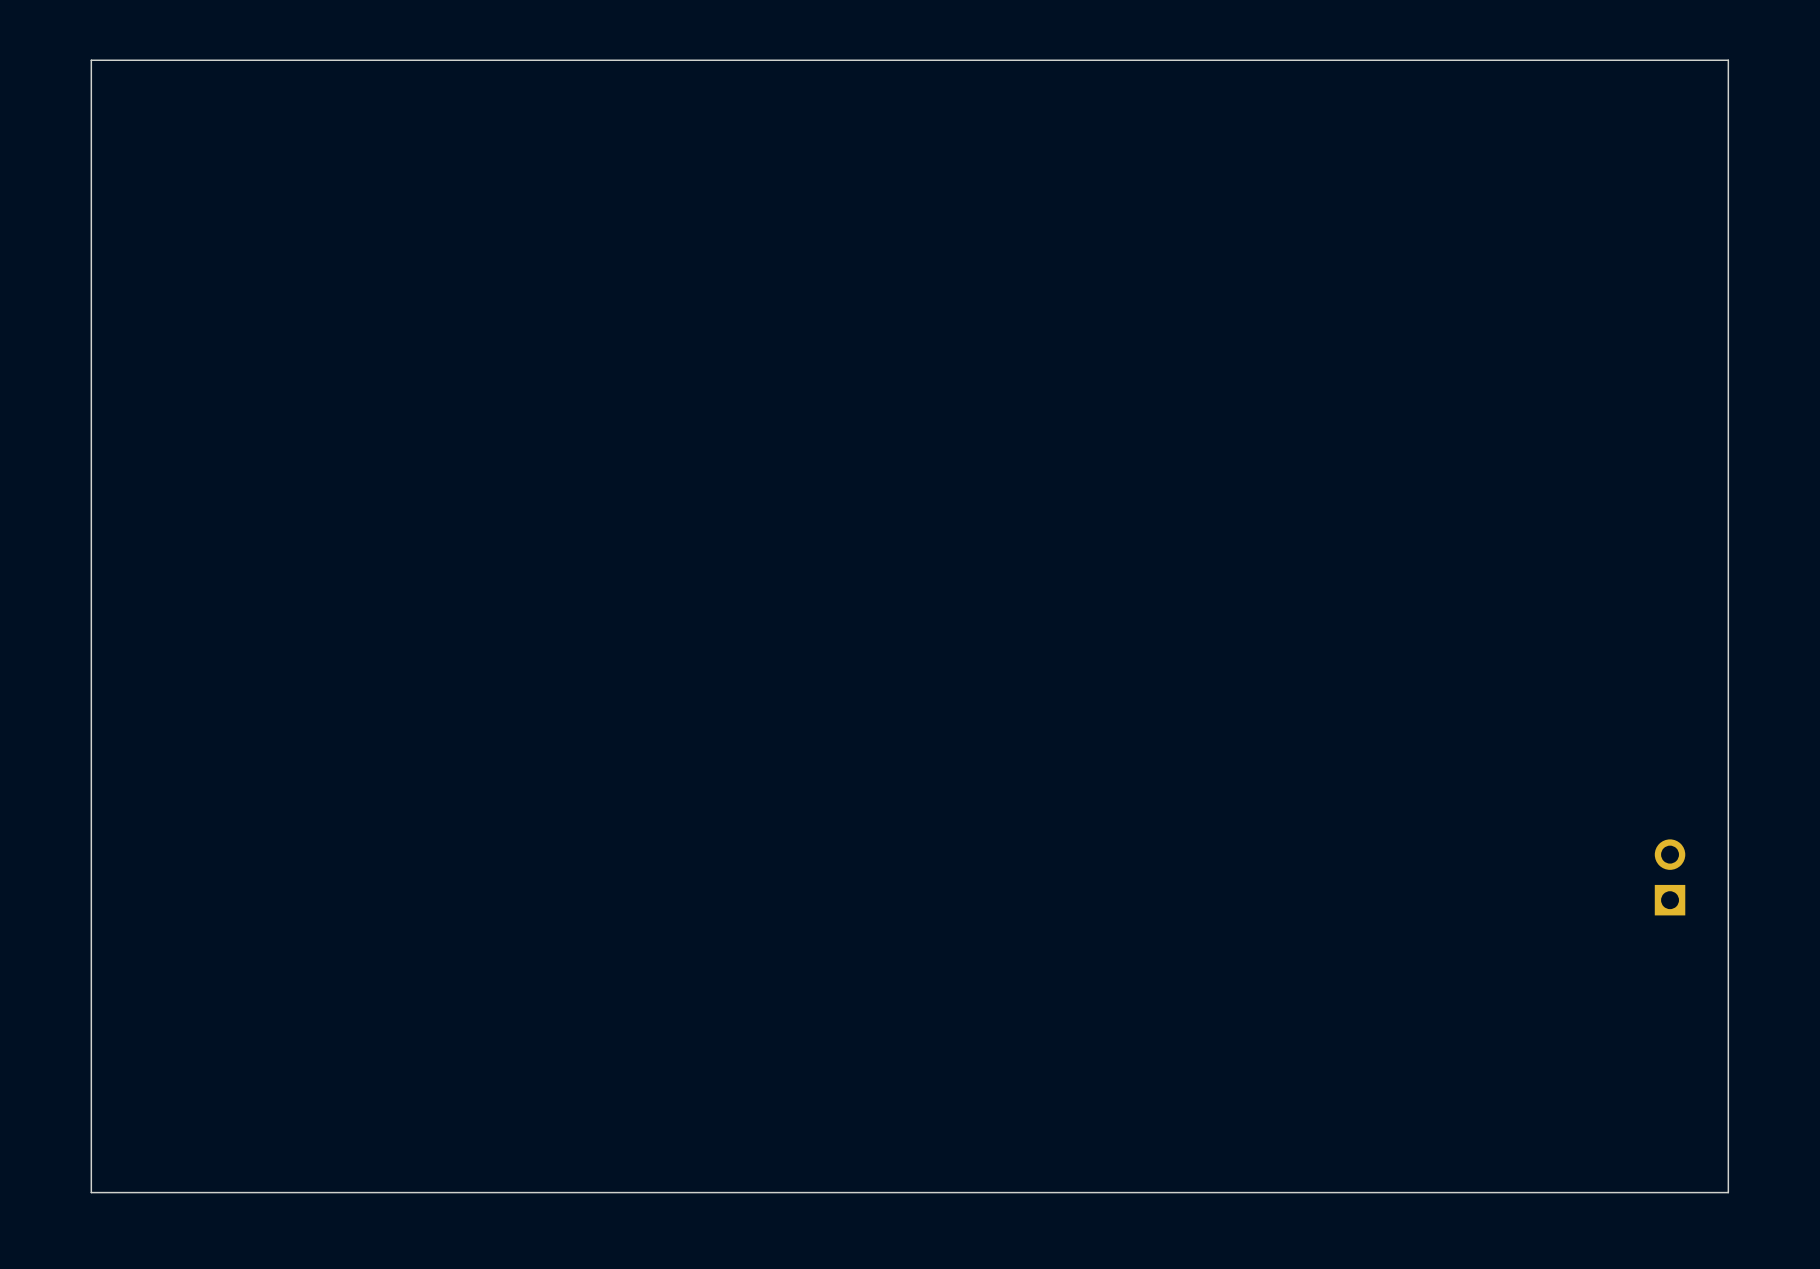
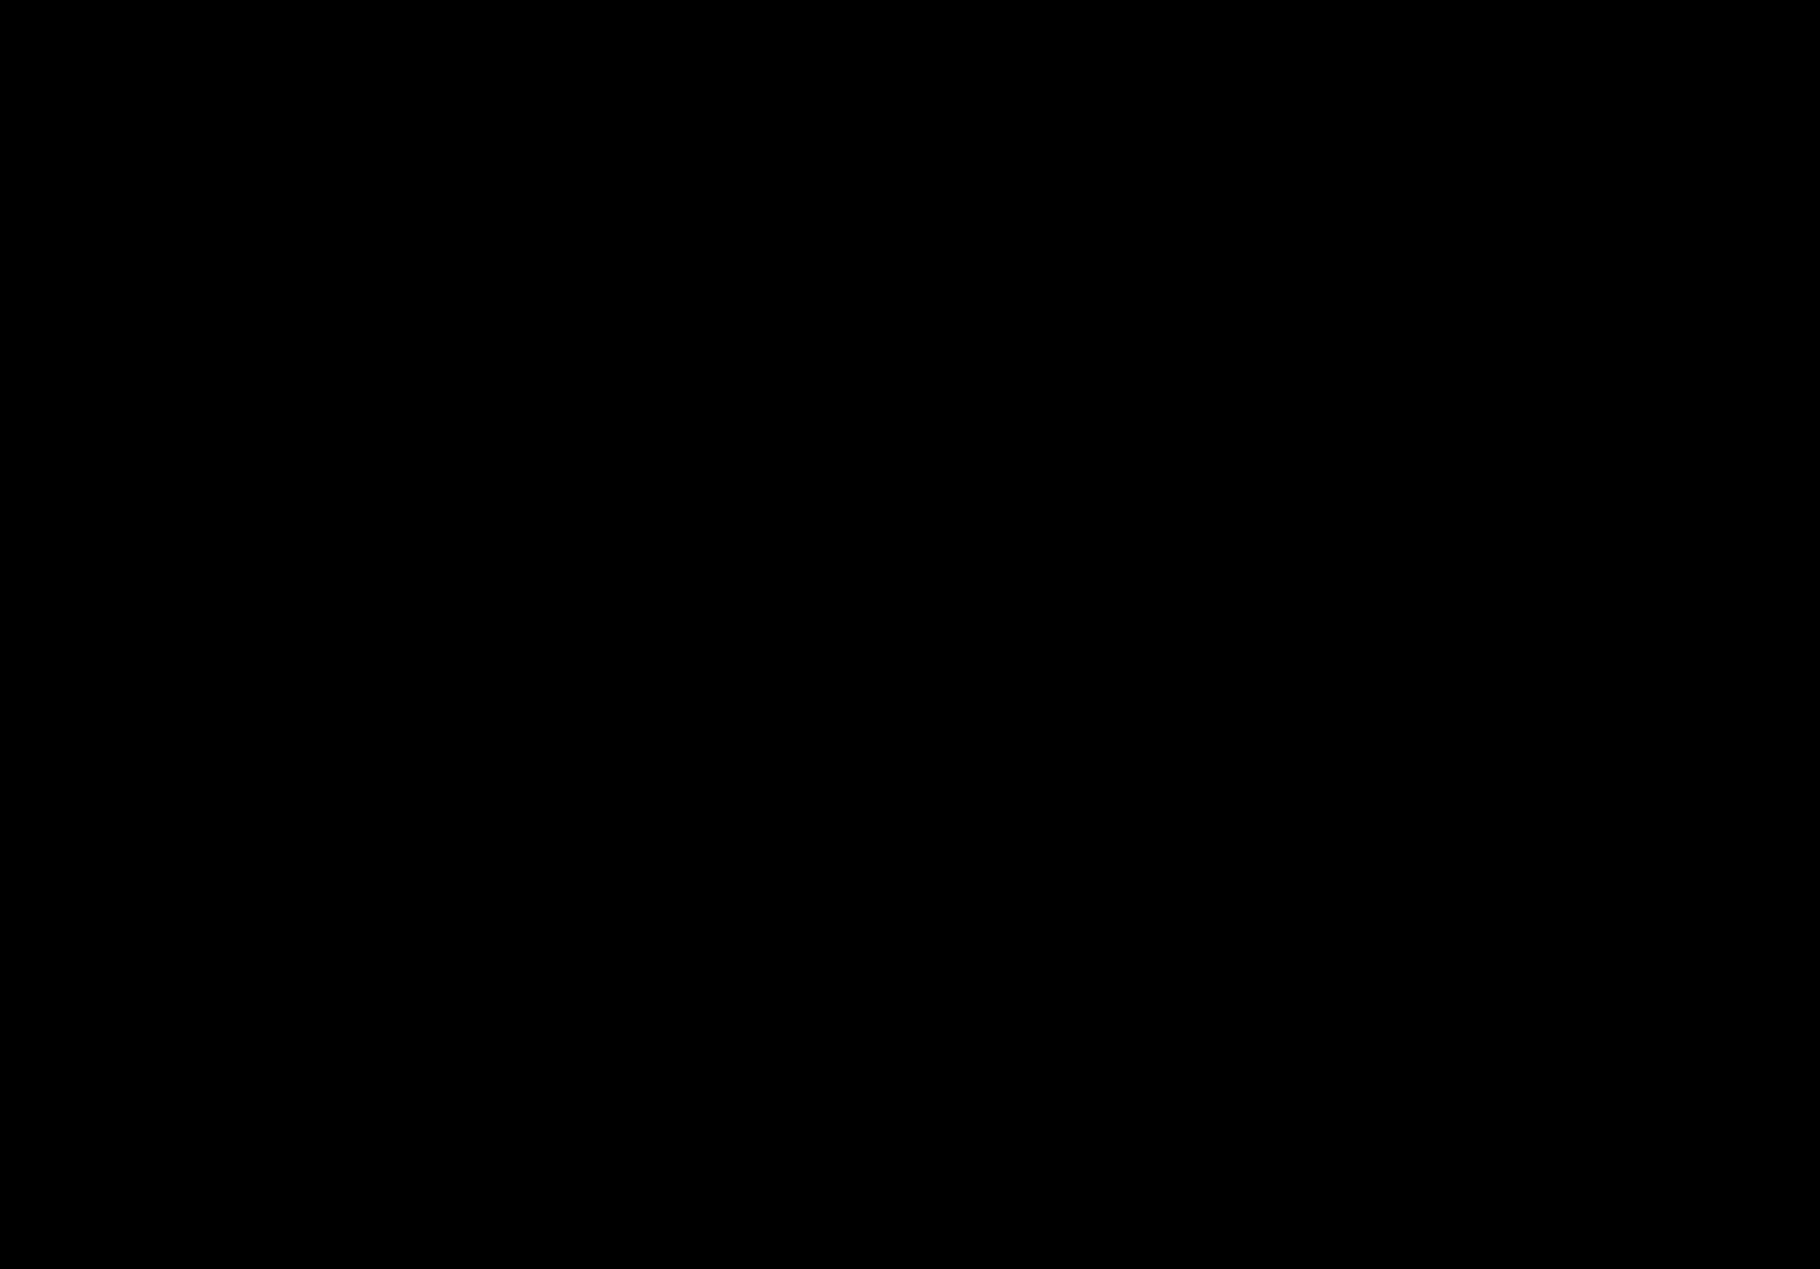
board edge: (1728, 60) (91, 60) (91, 1192) (1728, 1192) (1728, 60) -> none
part: (1670, 877) -> none

